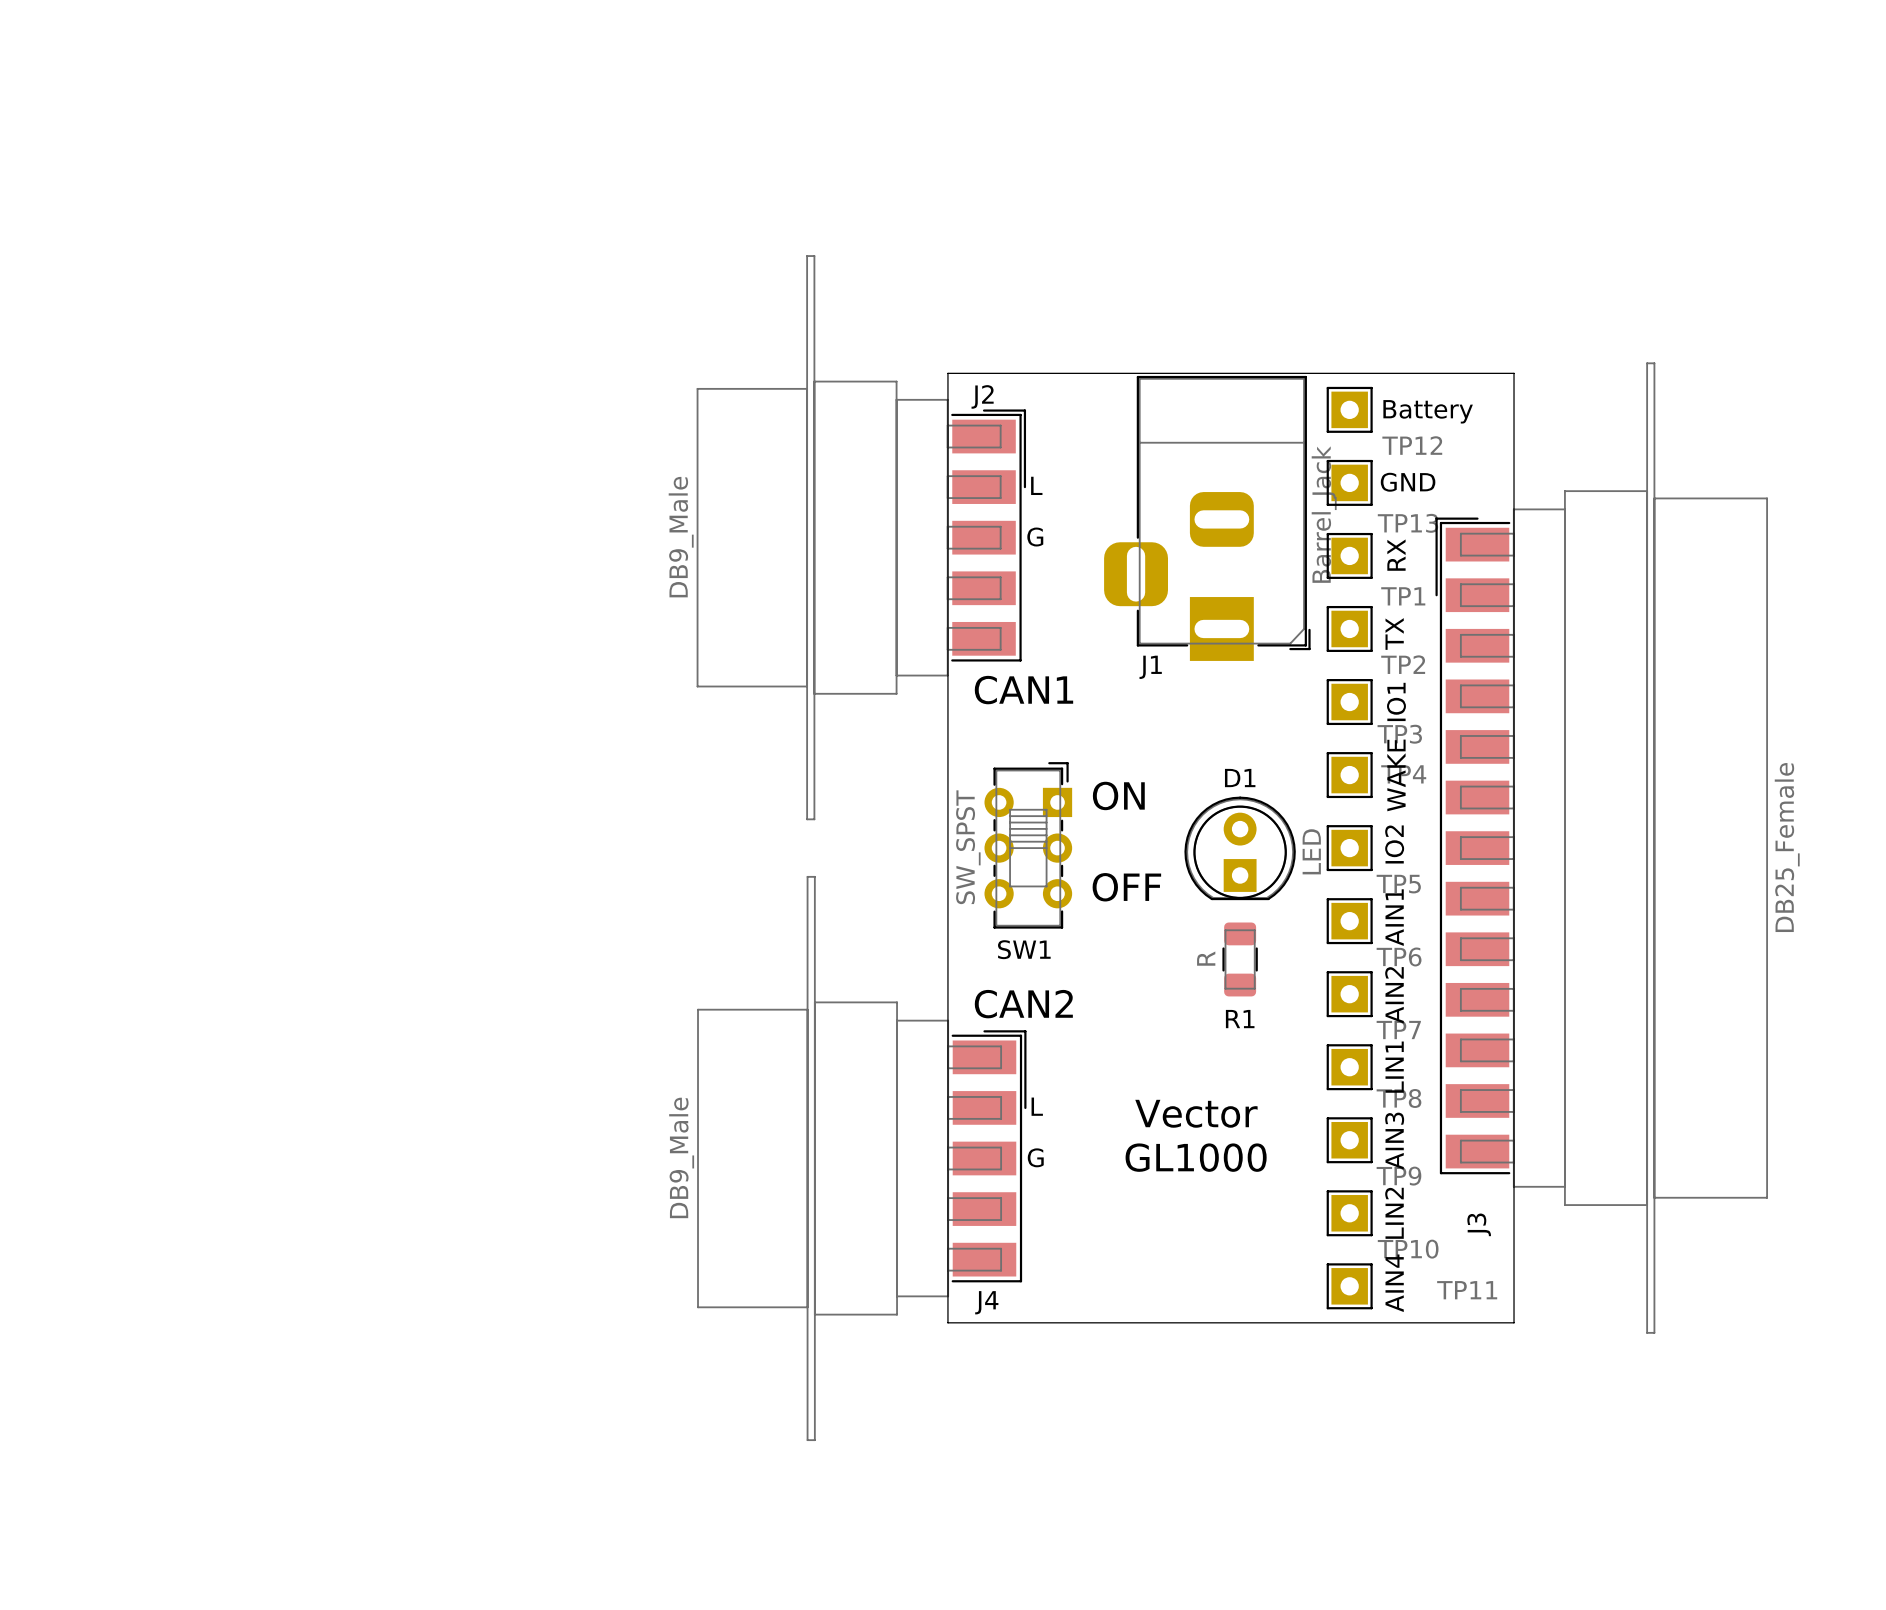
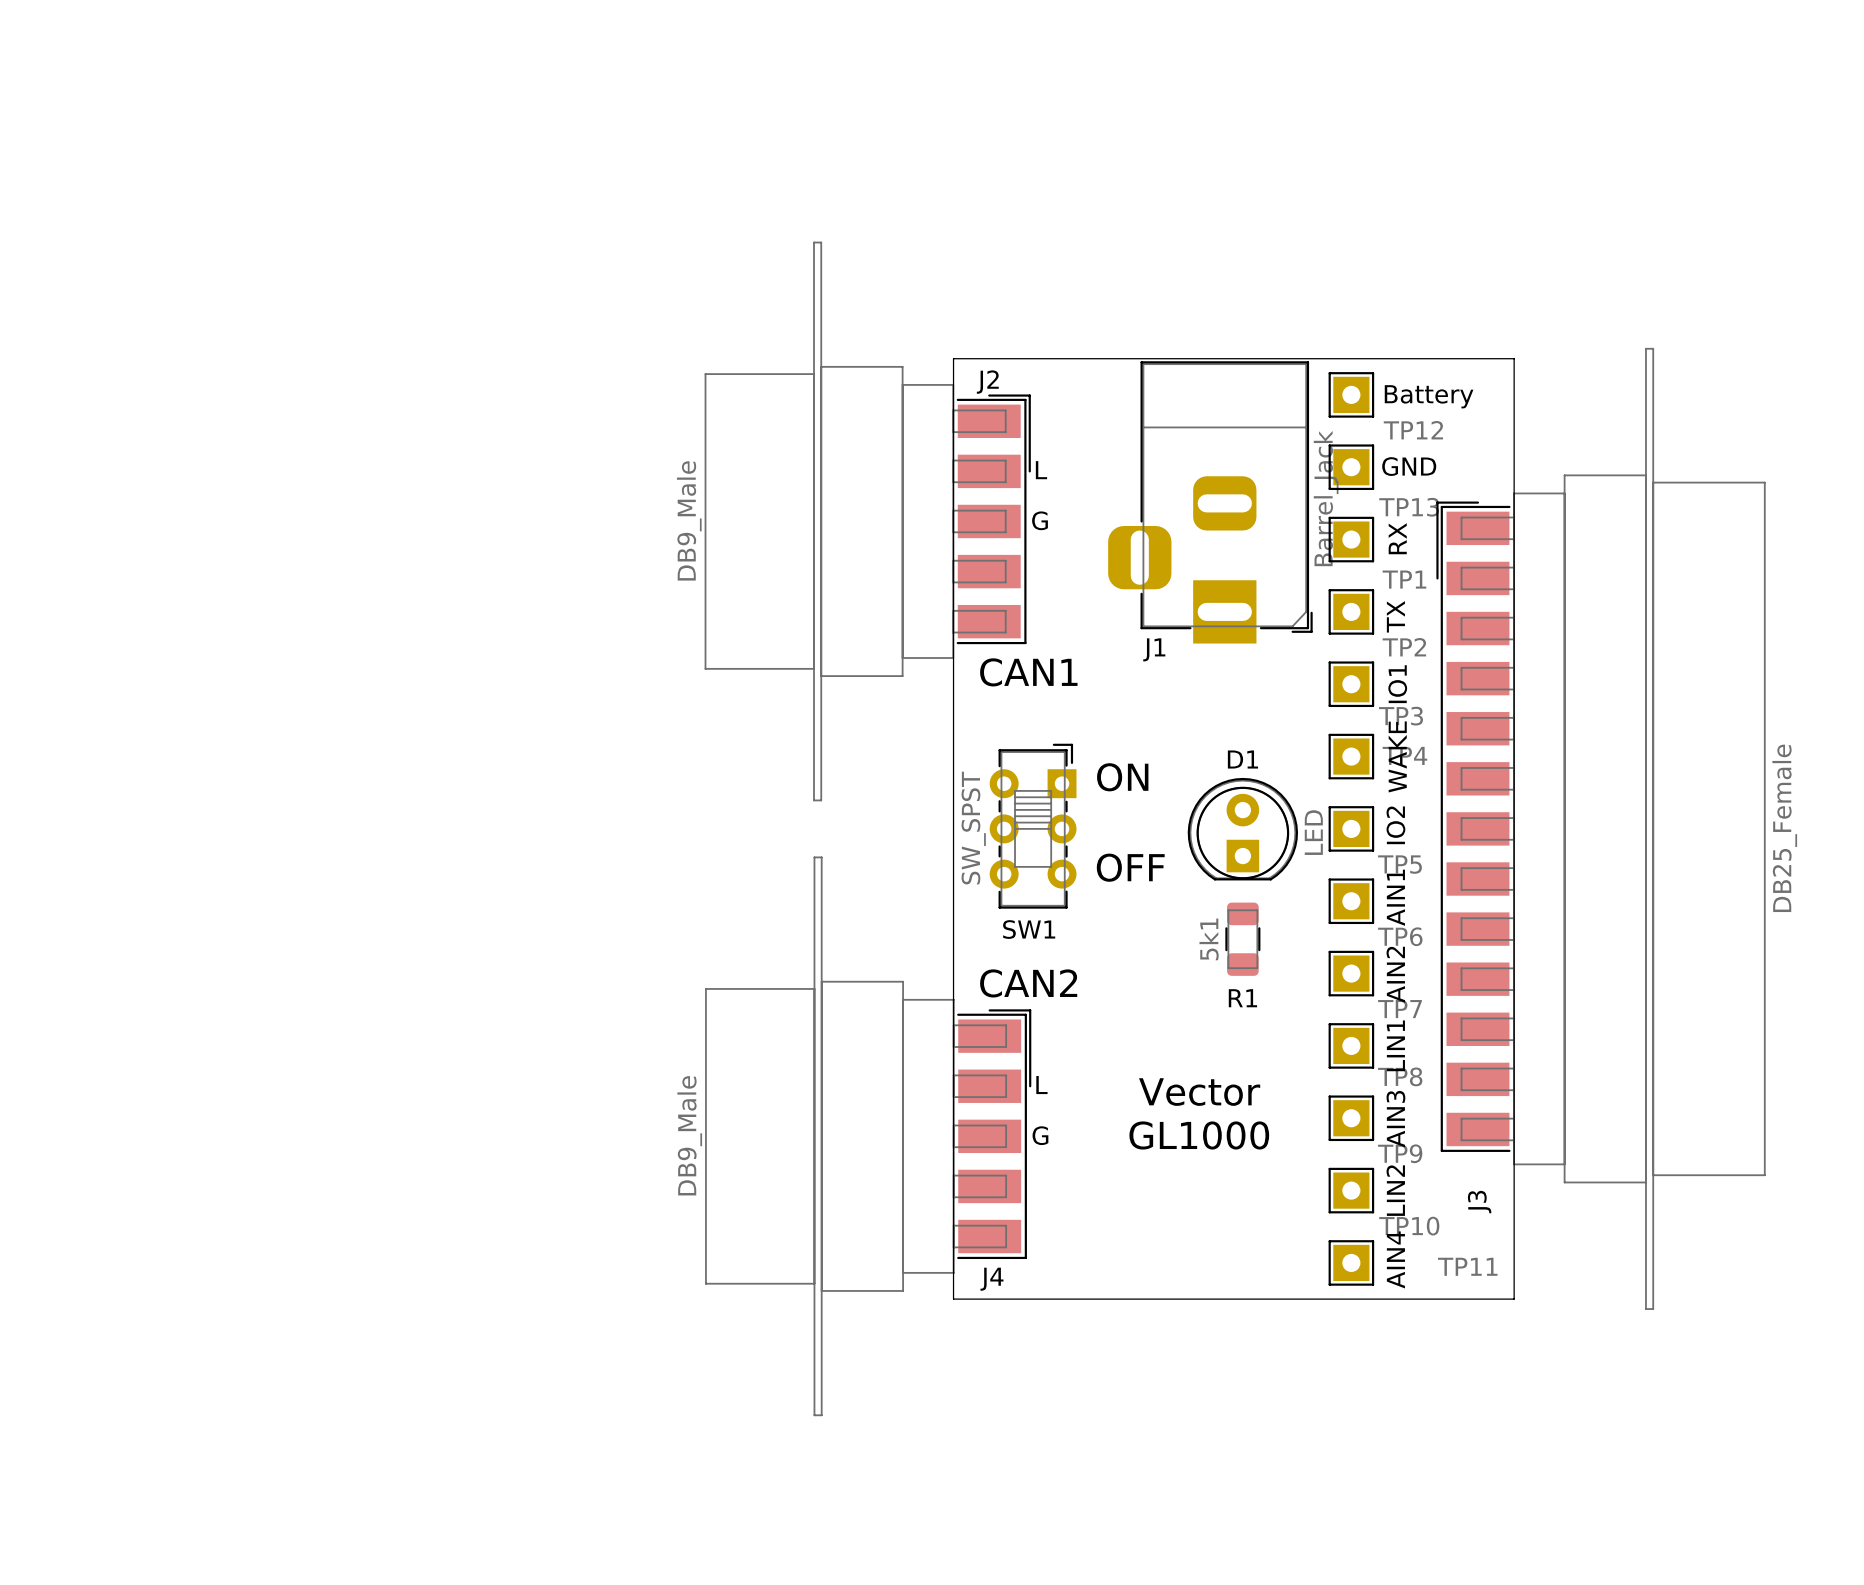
R1 value: R (1206, 958) -> 5k1 (1209, 939)

